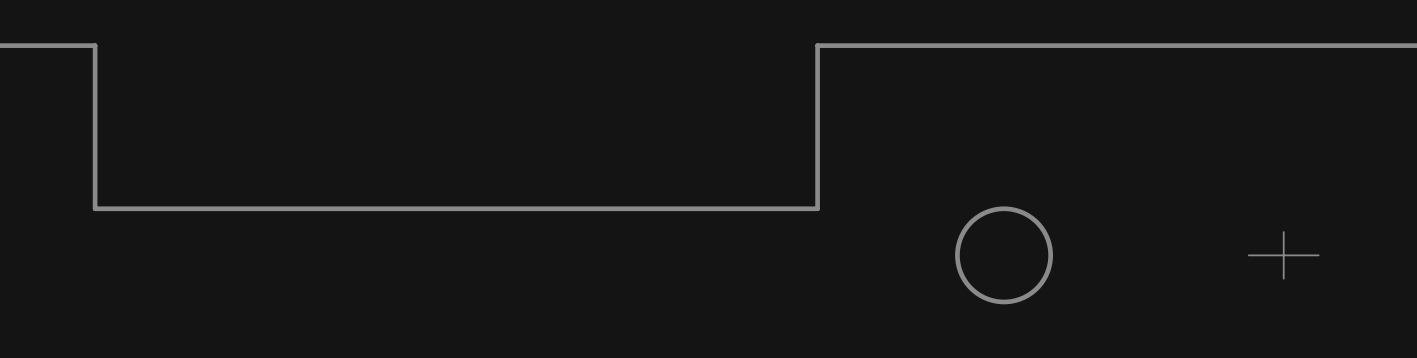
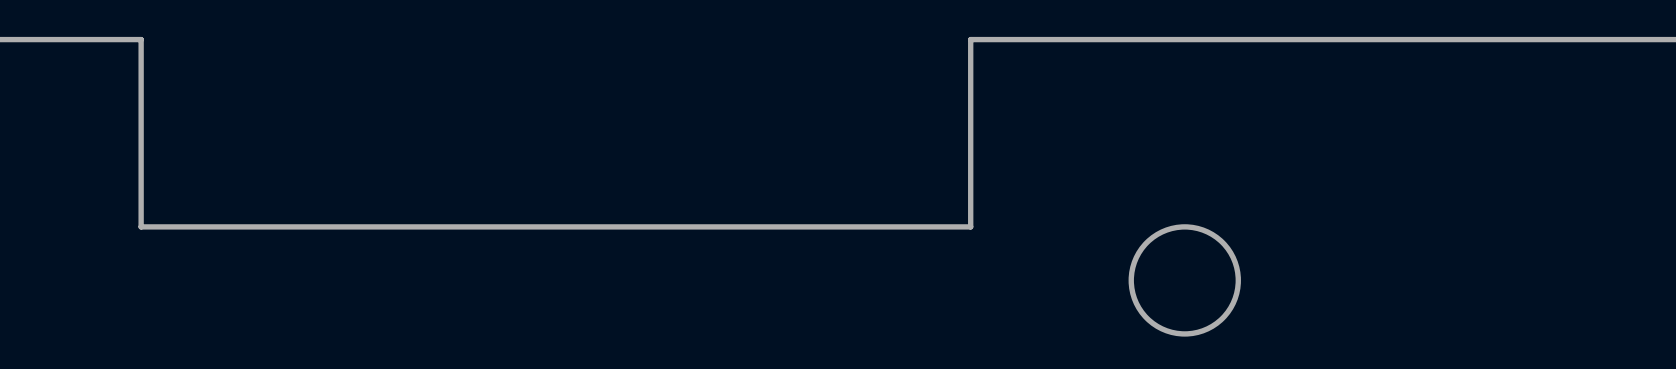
line: (1283, 232) (1283, 278) -> none
line: (1248, 255) (1318, 255) -> none

